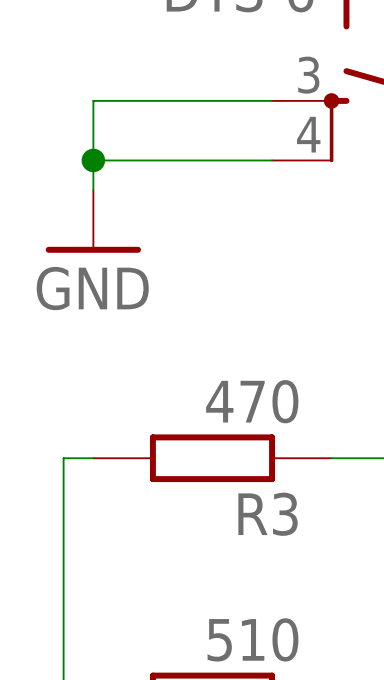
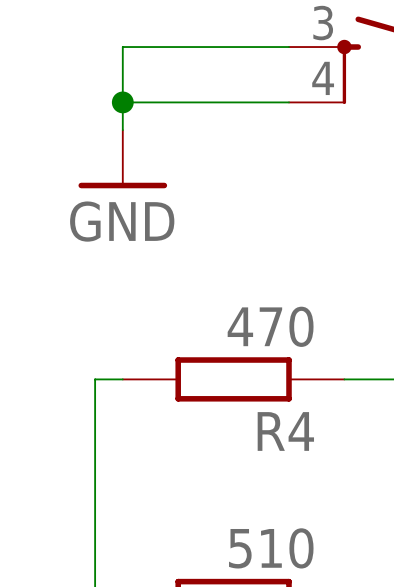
R3 name: R3 (268, 514) -> R4 (285, 431)

